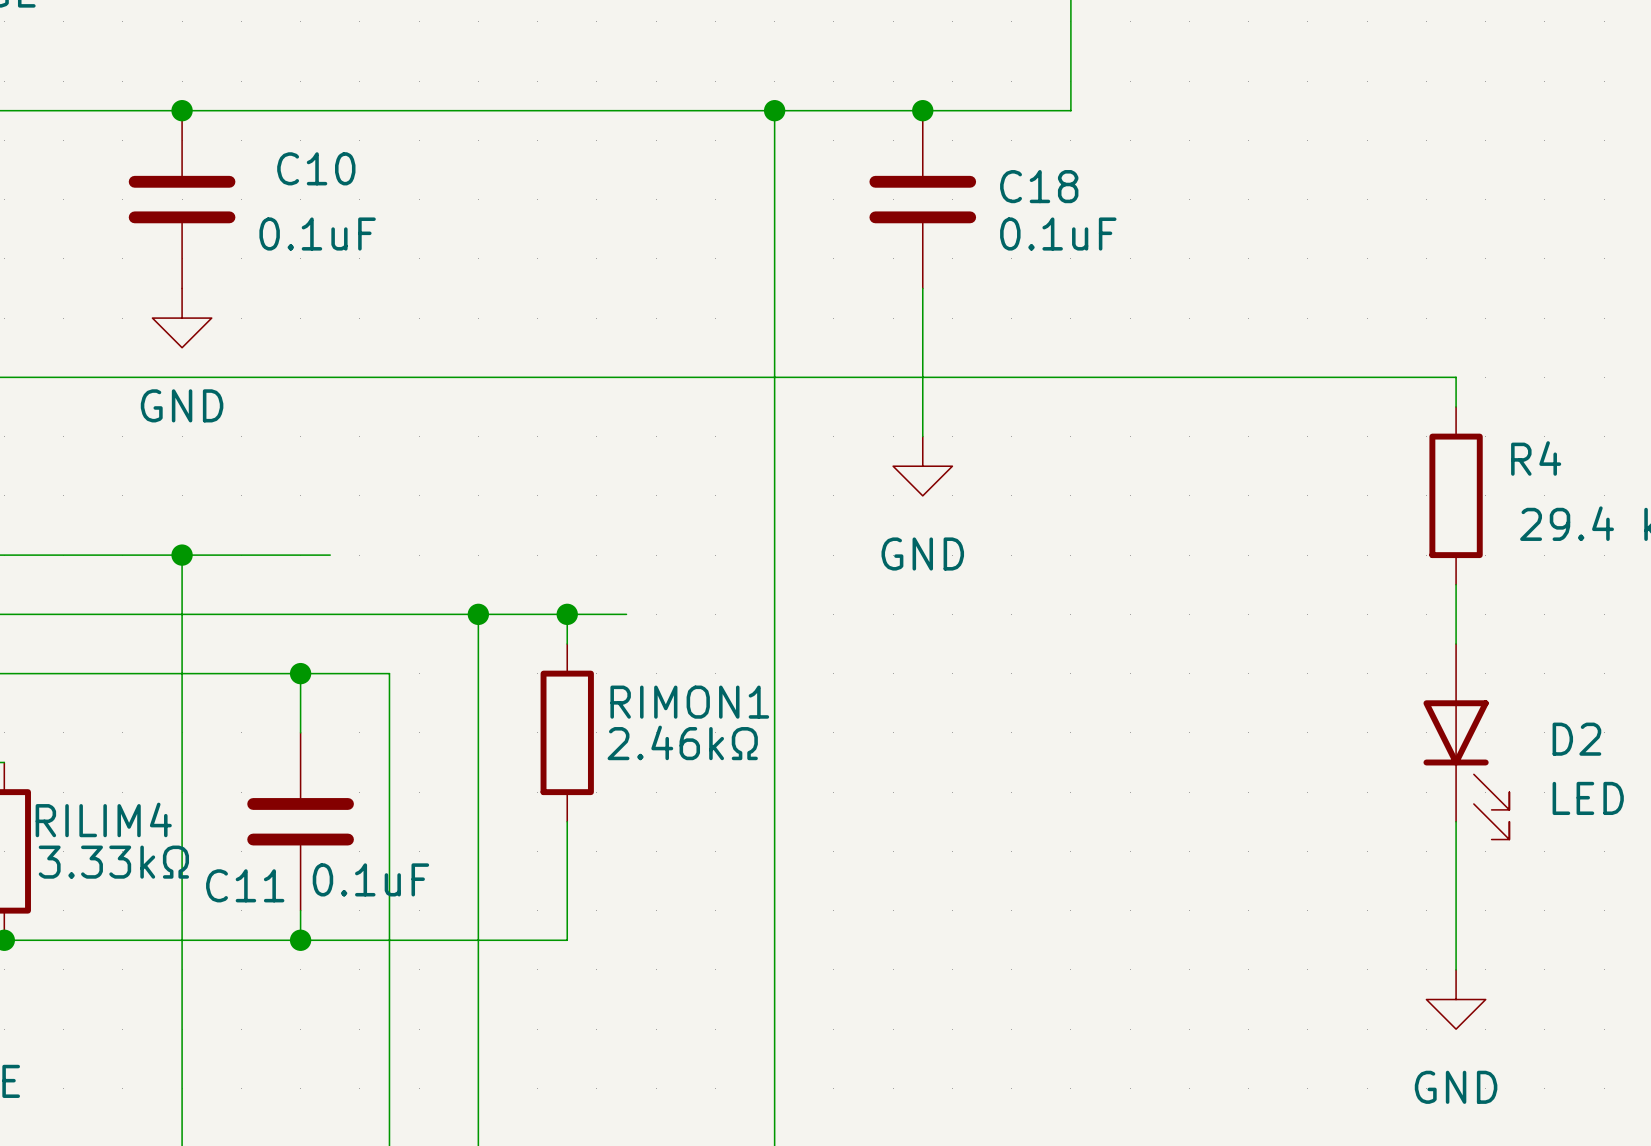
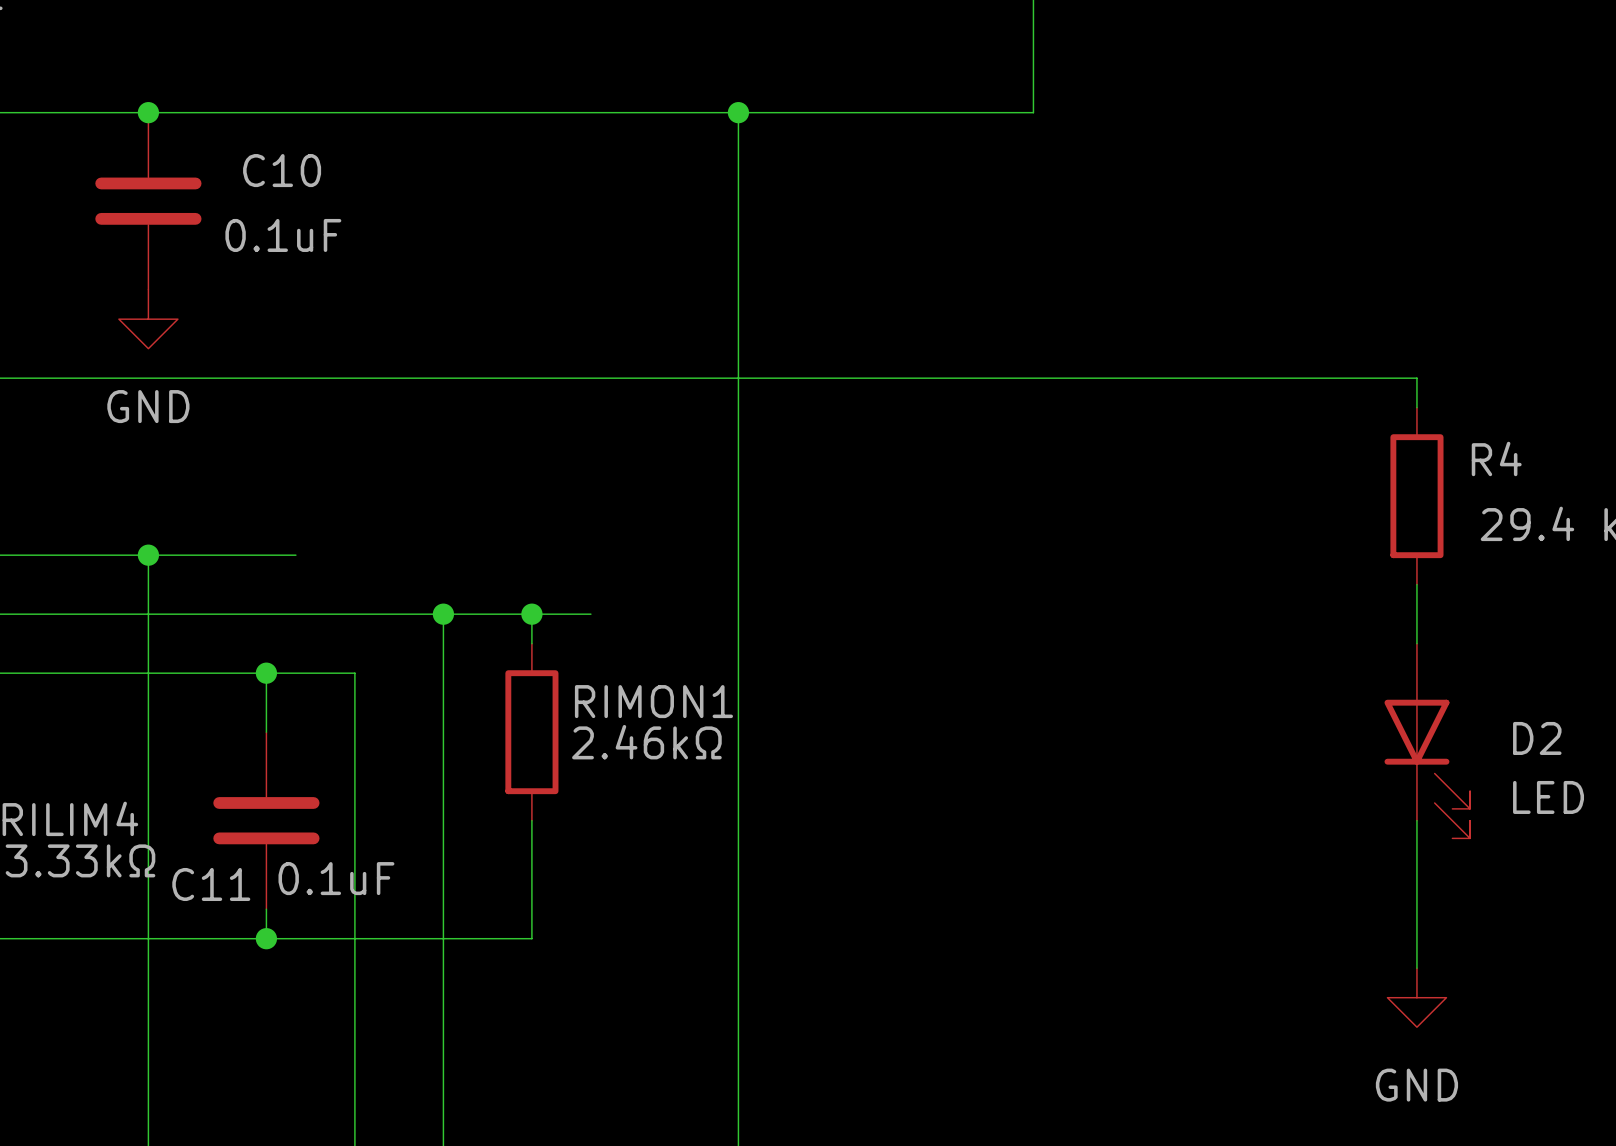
junction: (922, 110) -> none
C18: 0.1uF (922, 199) -> none
wire: (922, 288) (922, 436) -> none
power symbol: GND (922, 466) -> none

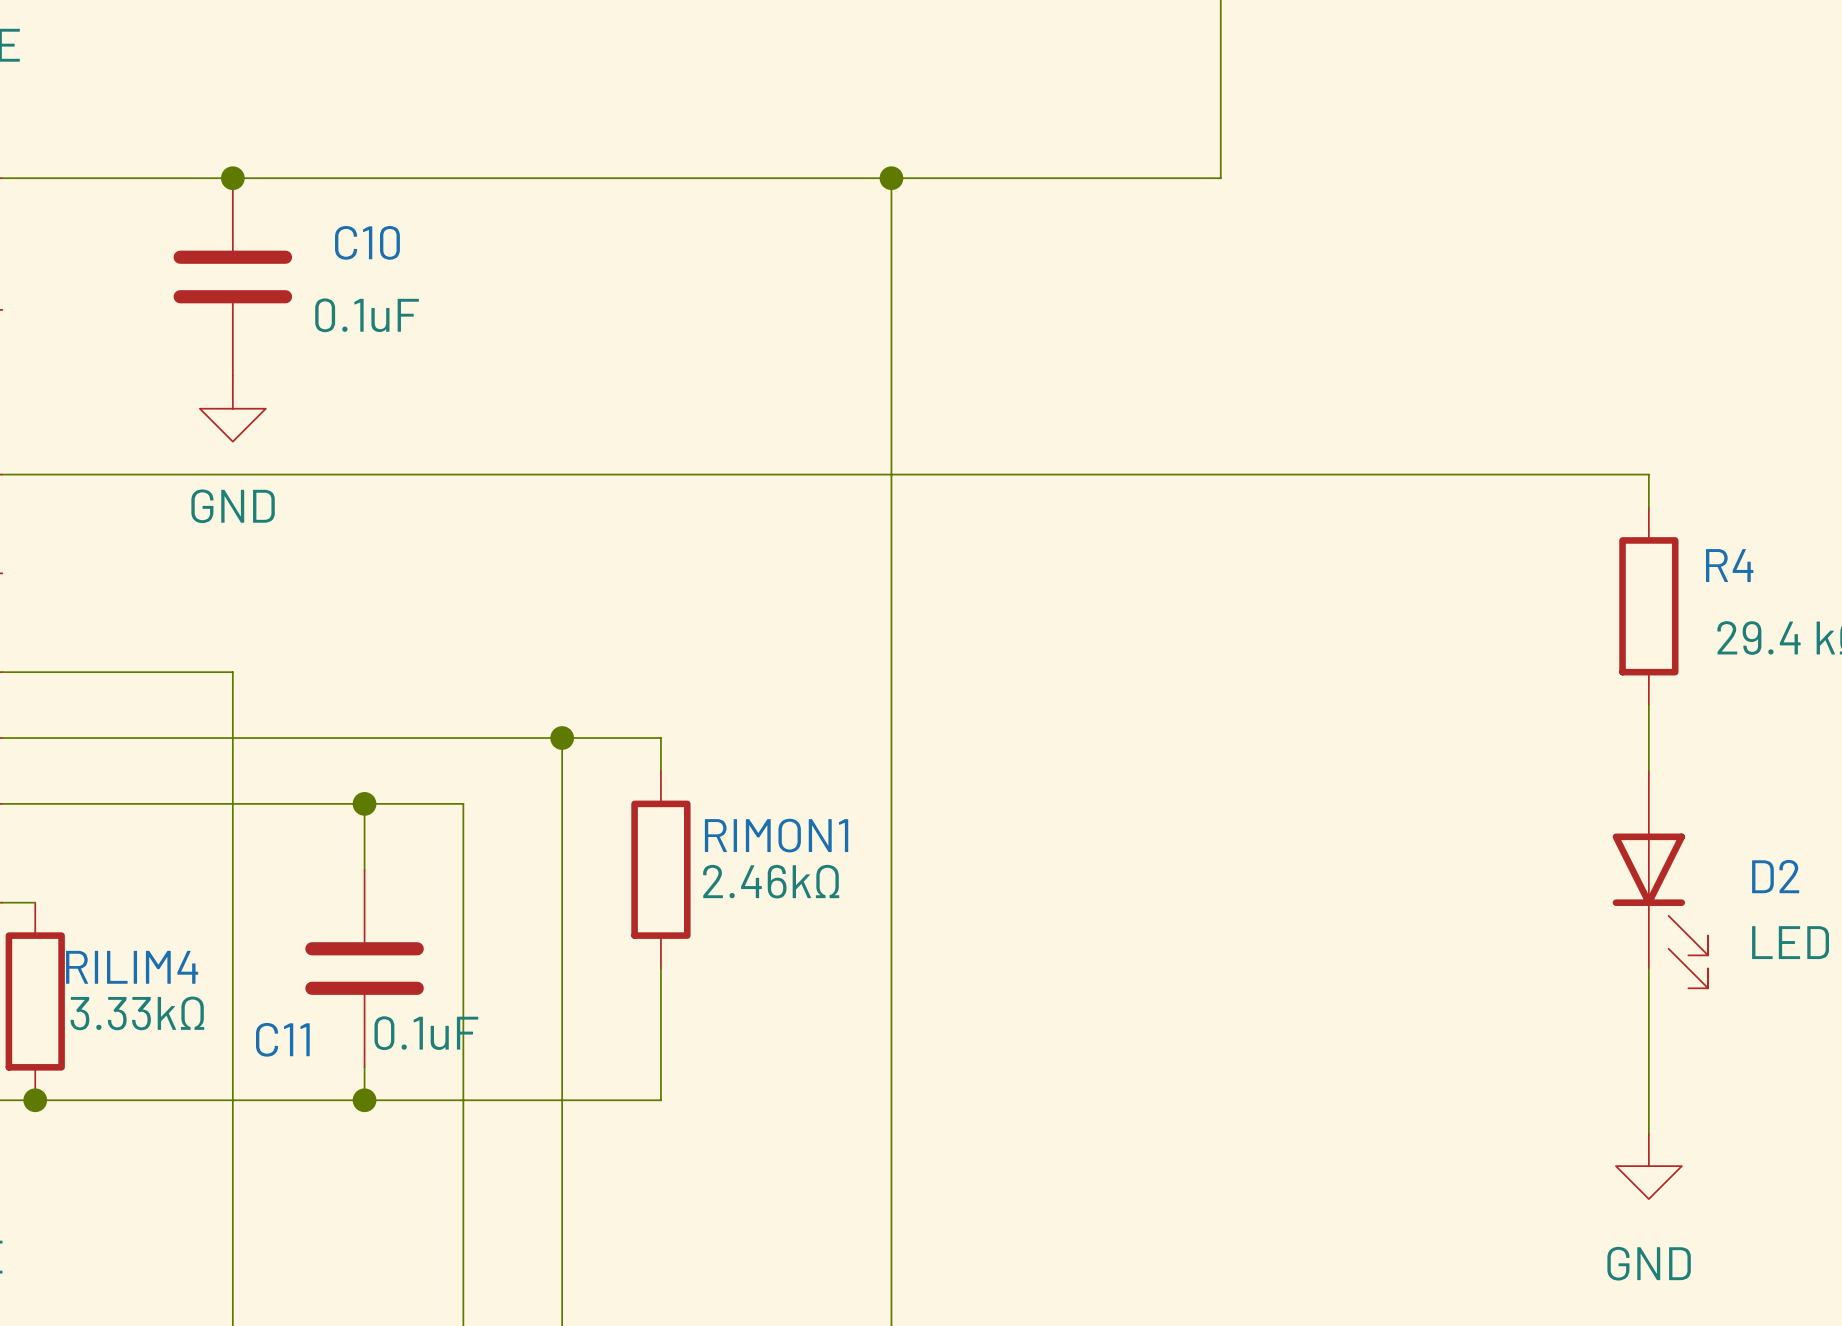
wire: (148, 555) (295, 555) -> none
junction: (148, 555) -> none
wire: (531, 614) (590, 614) -> none
junction: (531, 614) -> none

